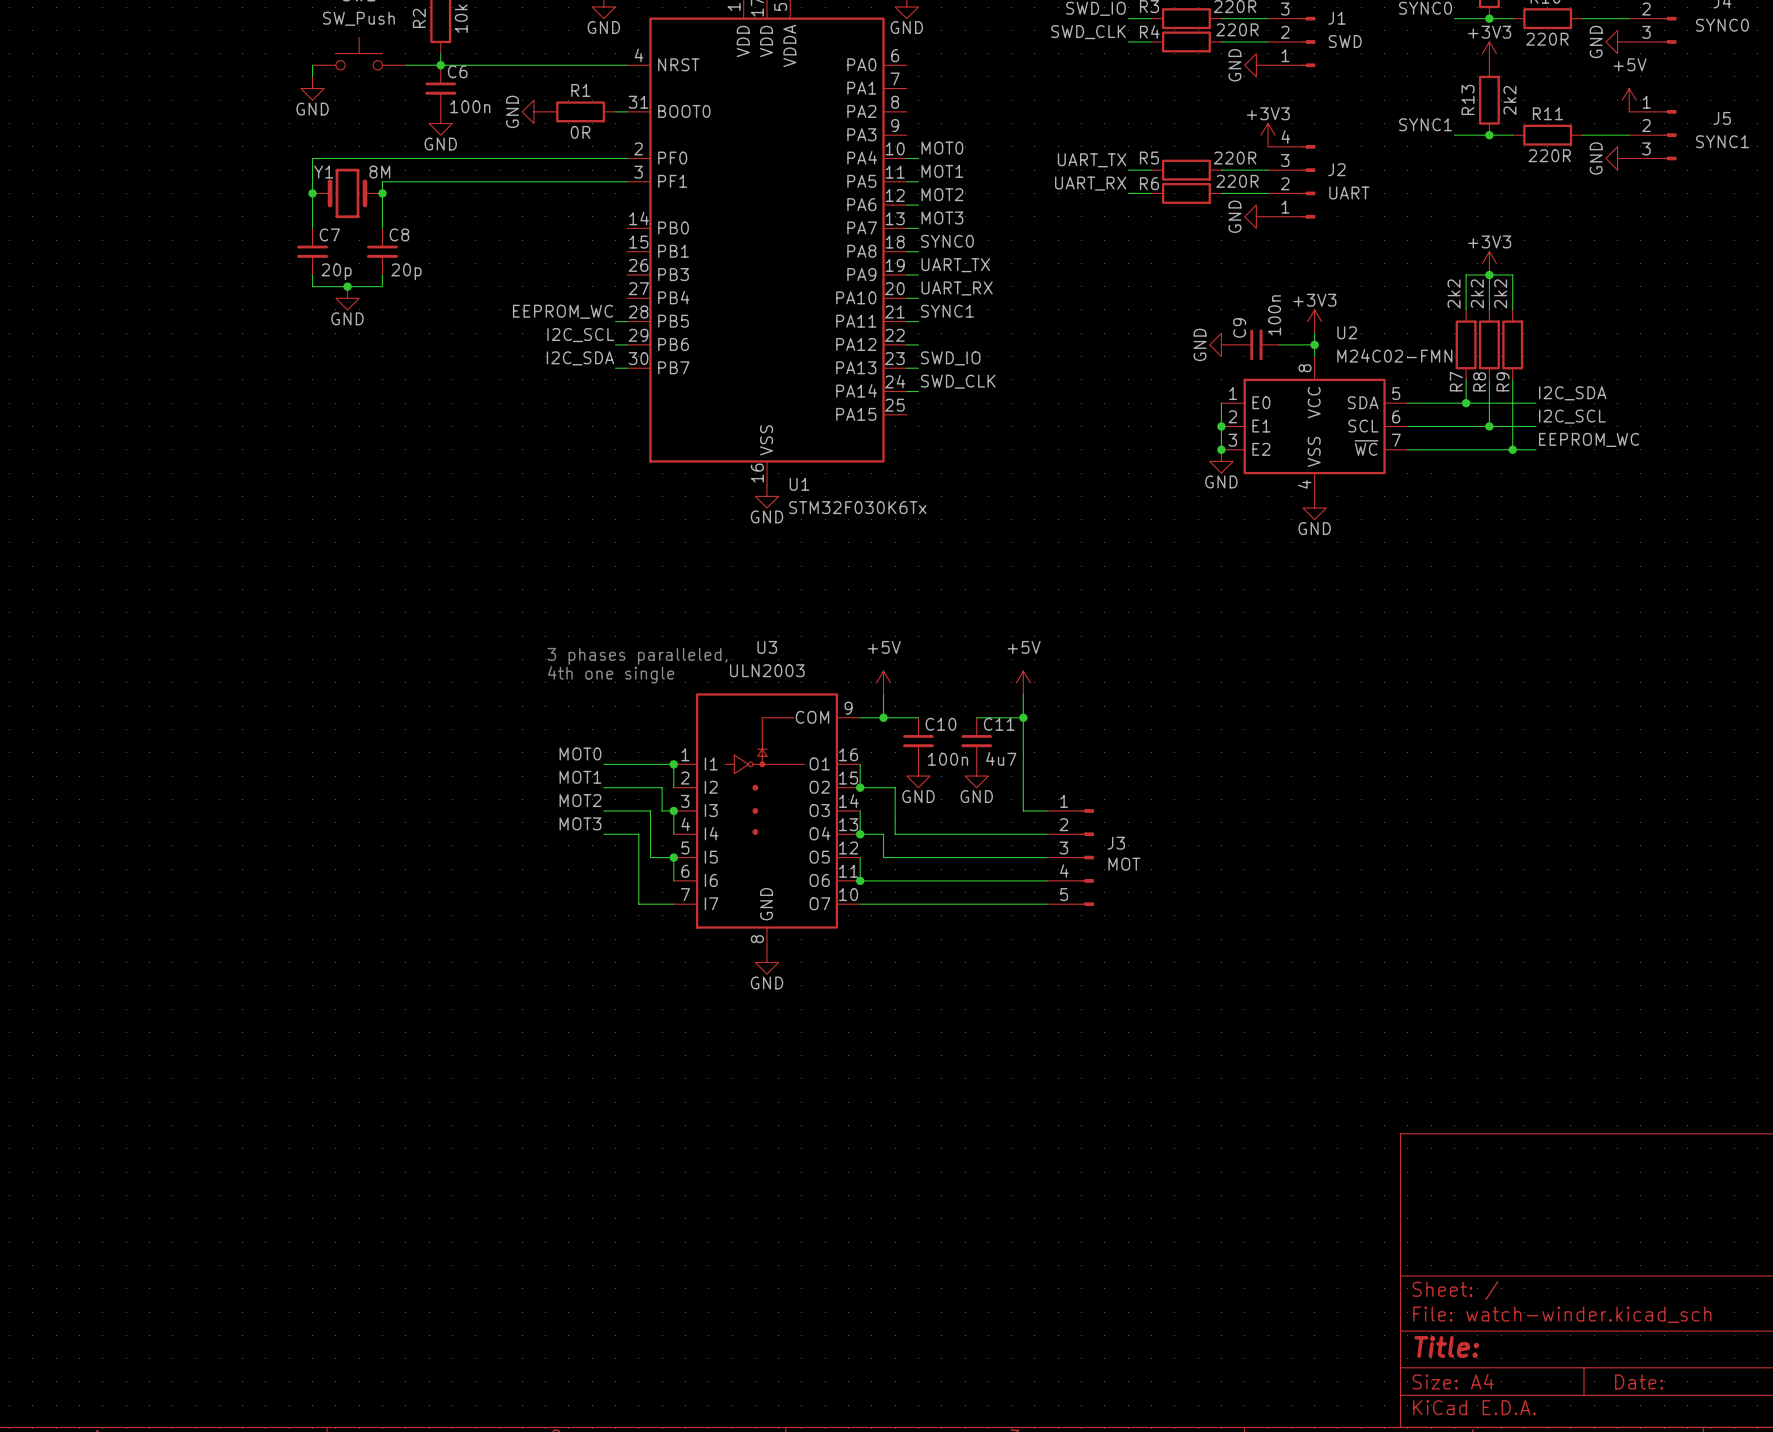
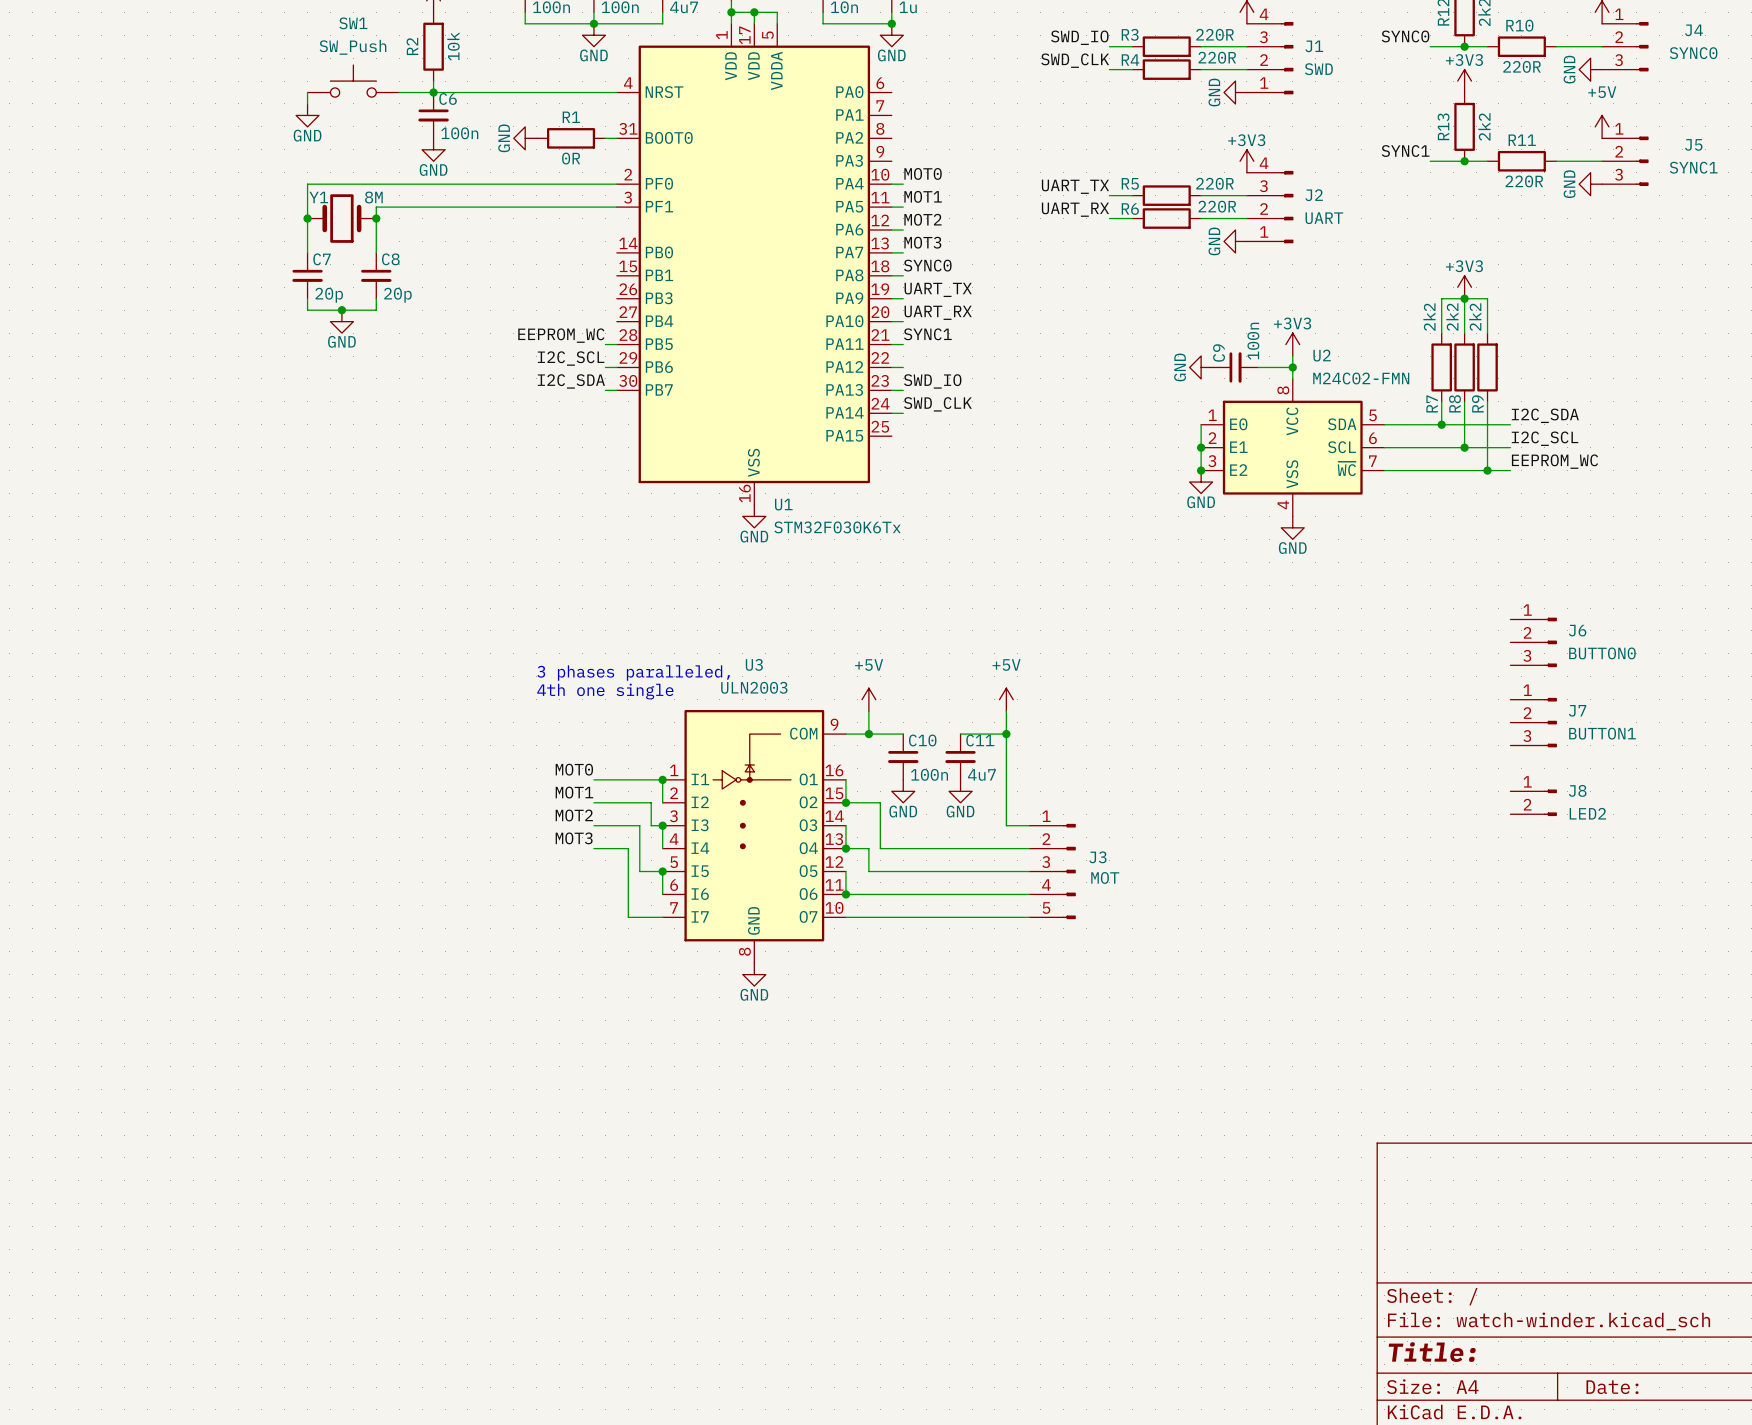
J6: none -> BUTTON0 (1533, 642)
J7: none -> BUTTON1 (1533, 722)
J8: none -> LED2 (1533, 802)

